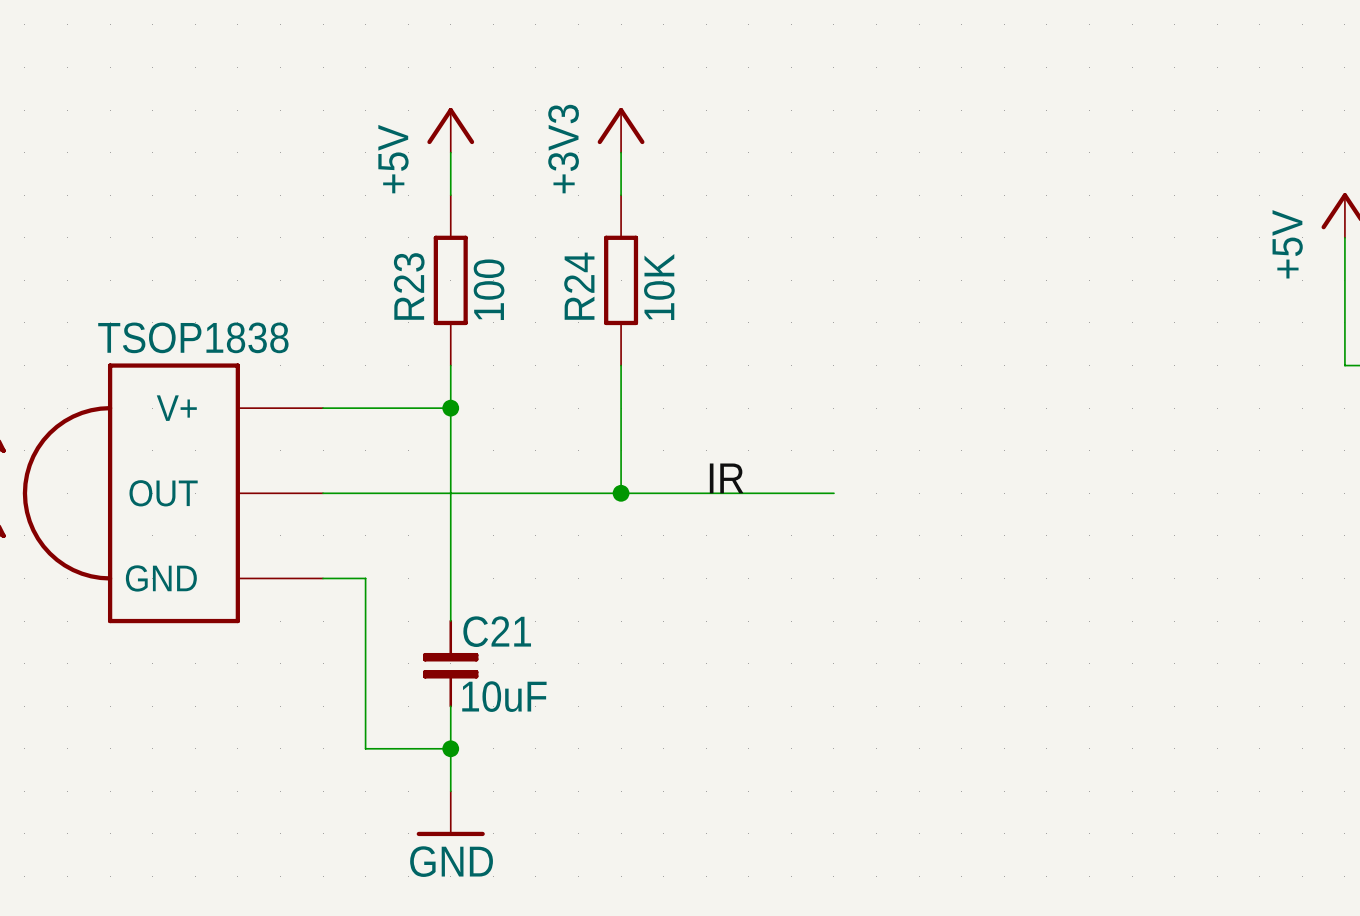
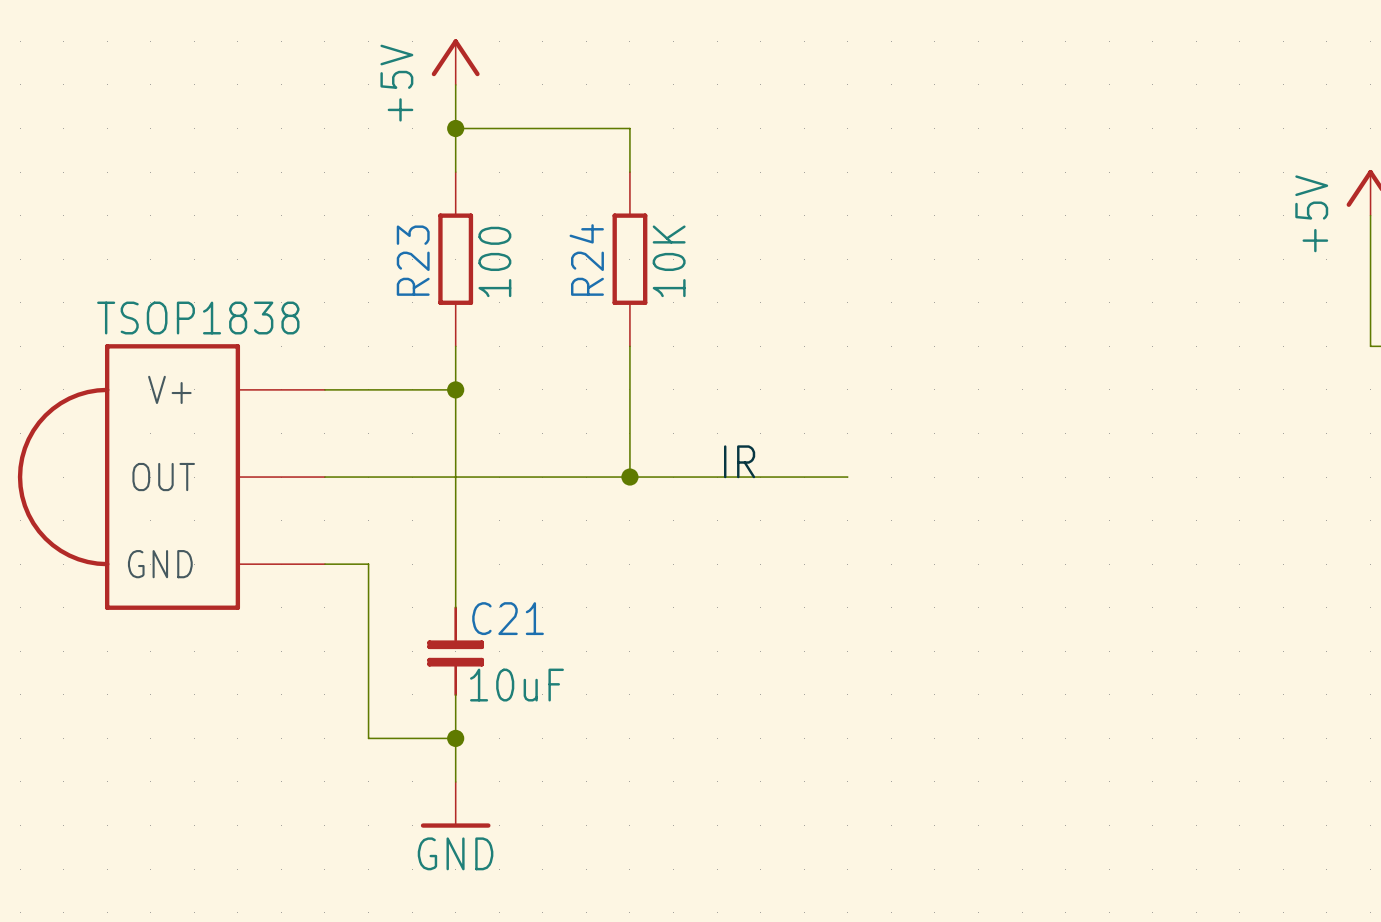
wire: none -> (455, 84) (455, 128) (629, 128)
power symbol position: +5V (450, 130) -> +5V (455, 62)
power symbol: +3V3 (621, 130) -> none
junction: none -> (455, 128)

